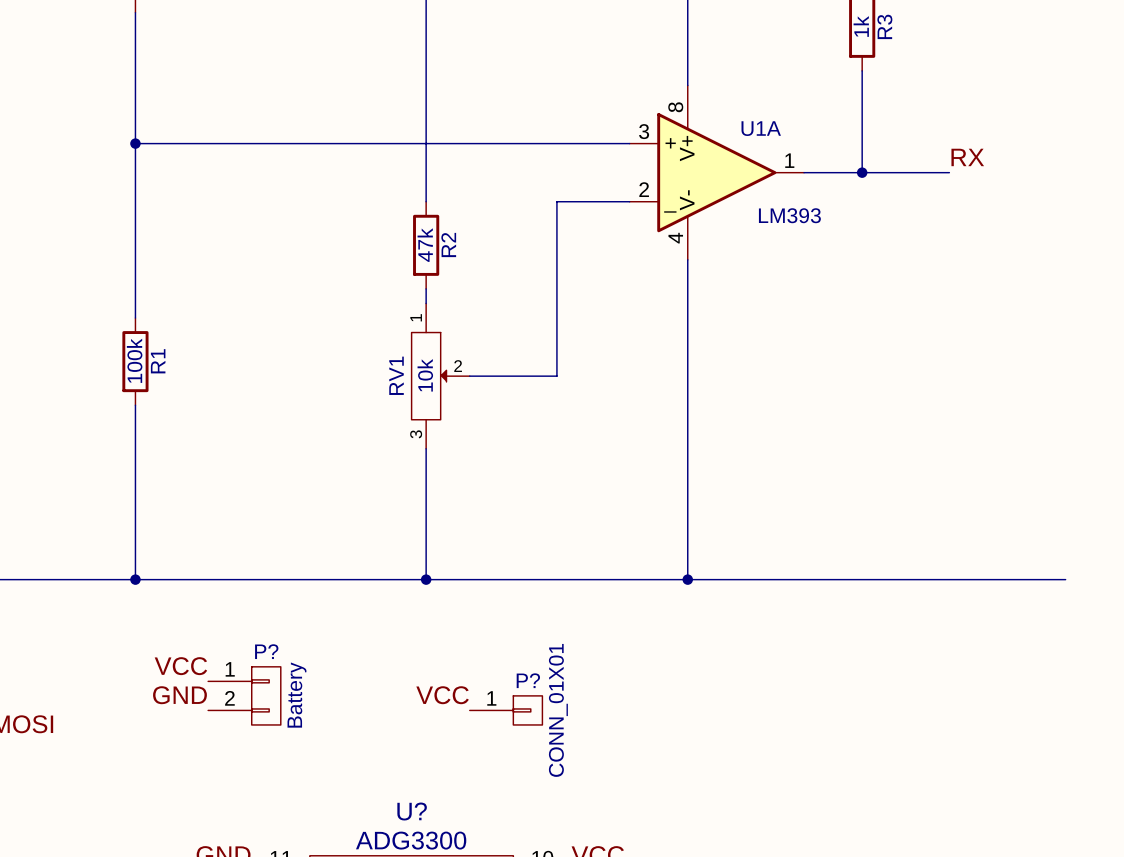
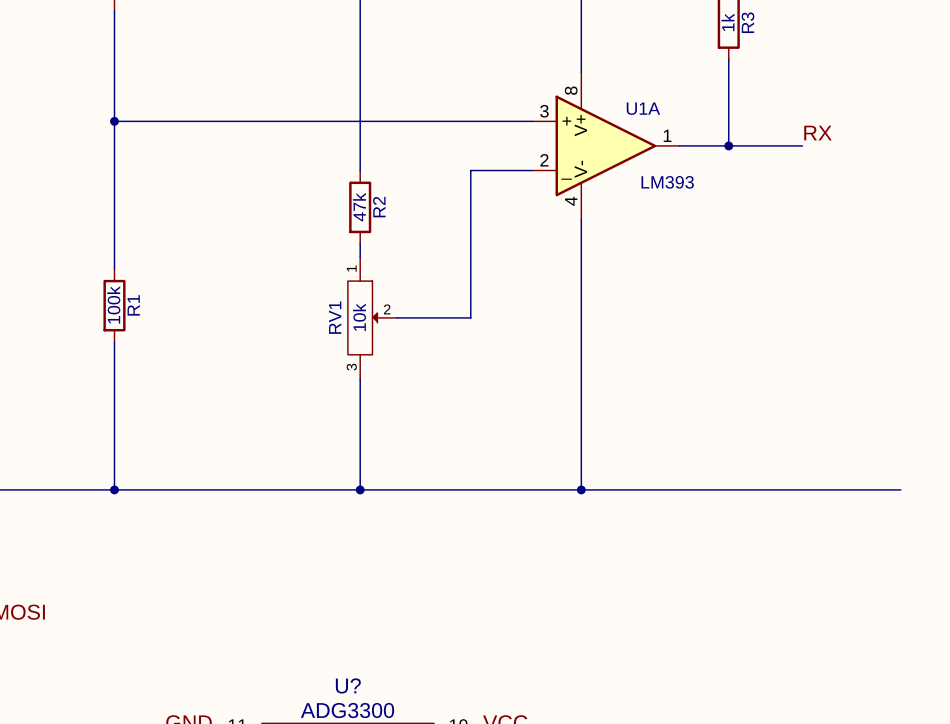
label: VCC (180, 666) -> none
label: GND (179, 695) -> none
P?: Battery (244, 695) -> none
label: VCC (442, 695) -> none
P?: CONN_01X01 (506, 710) -> none

